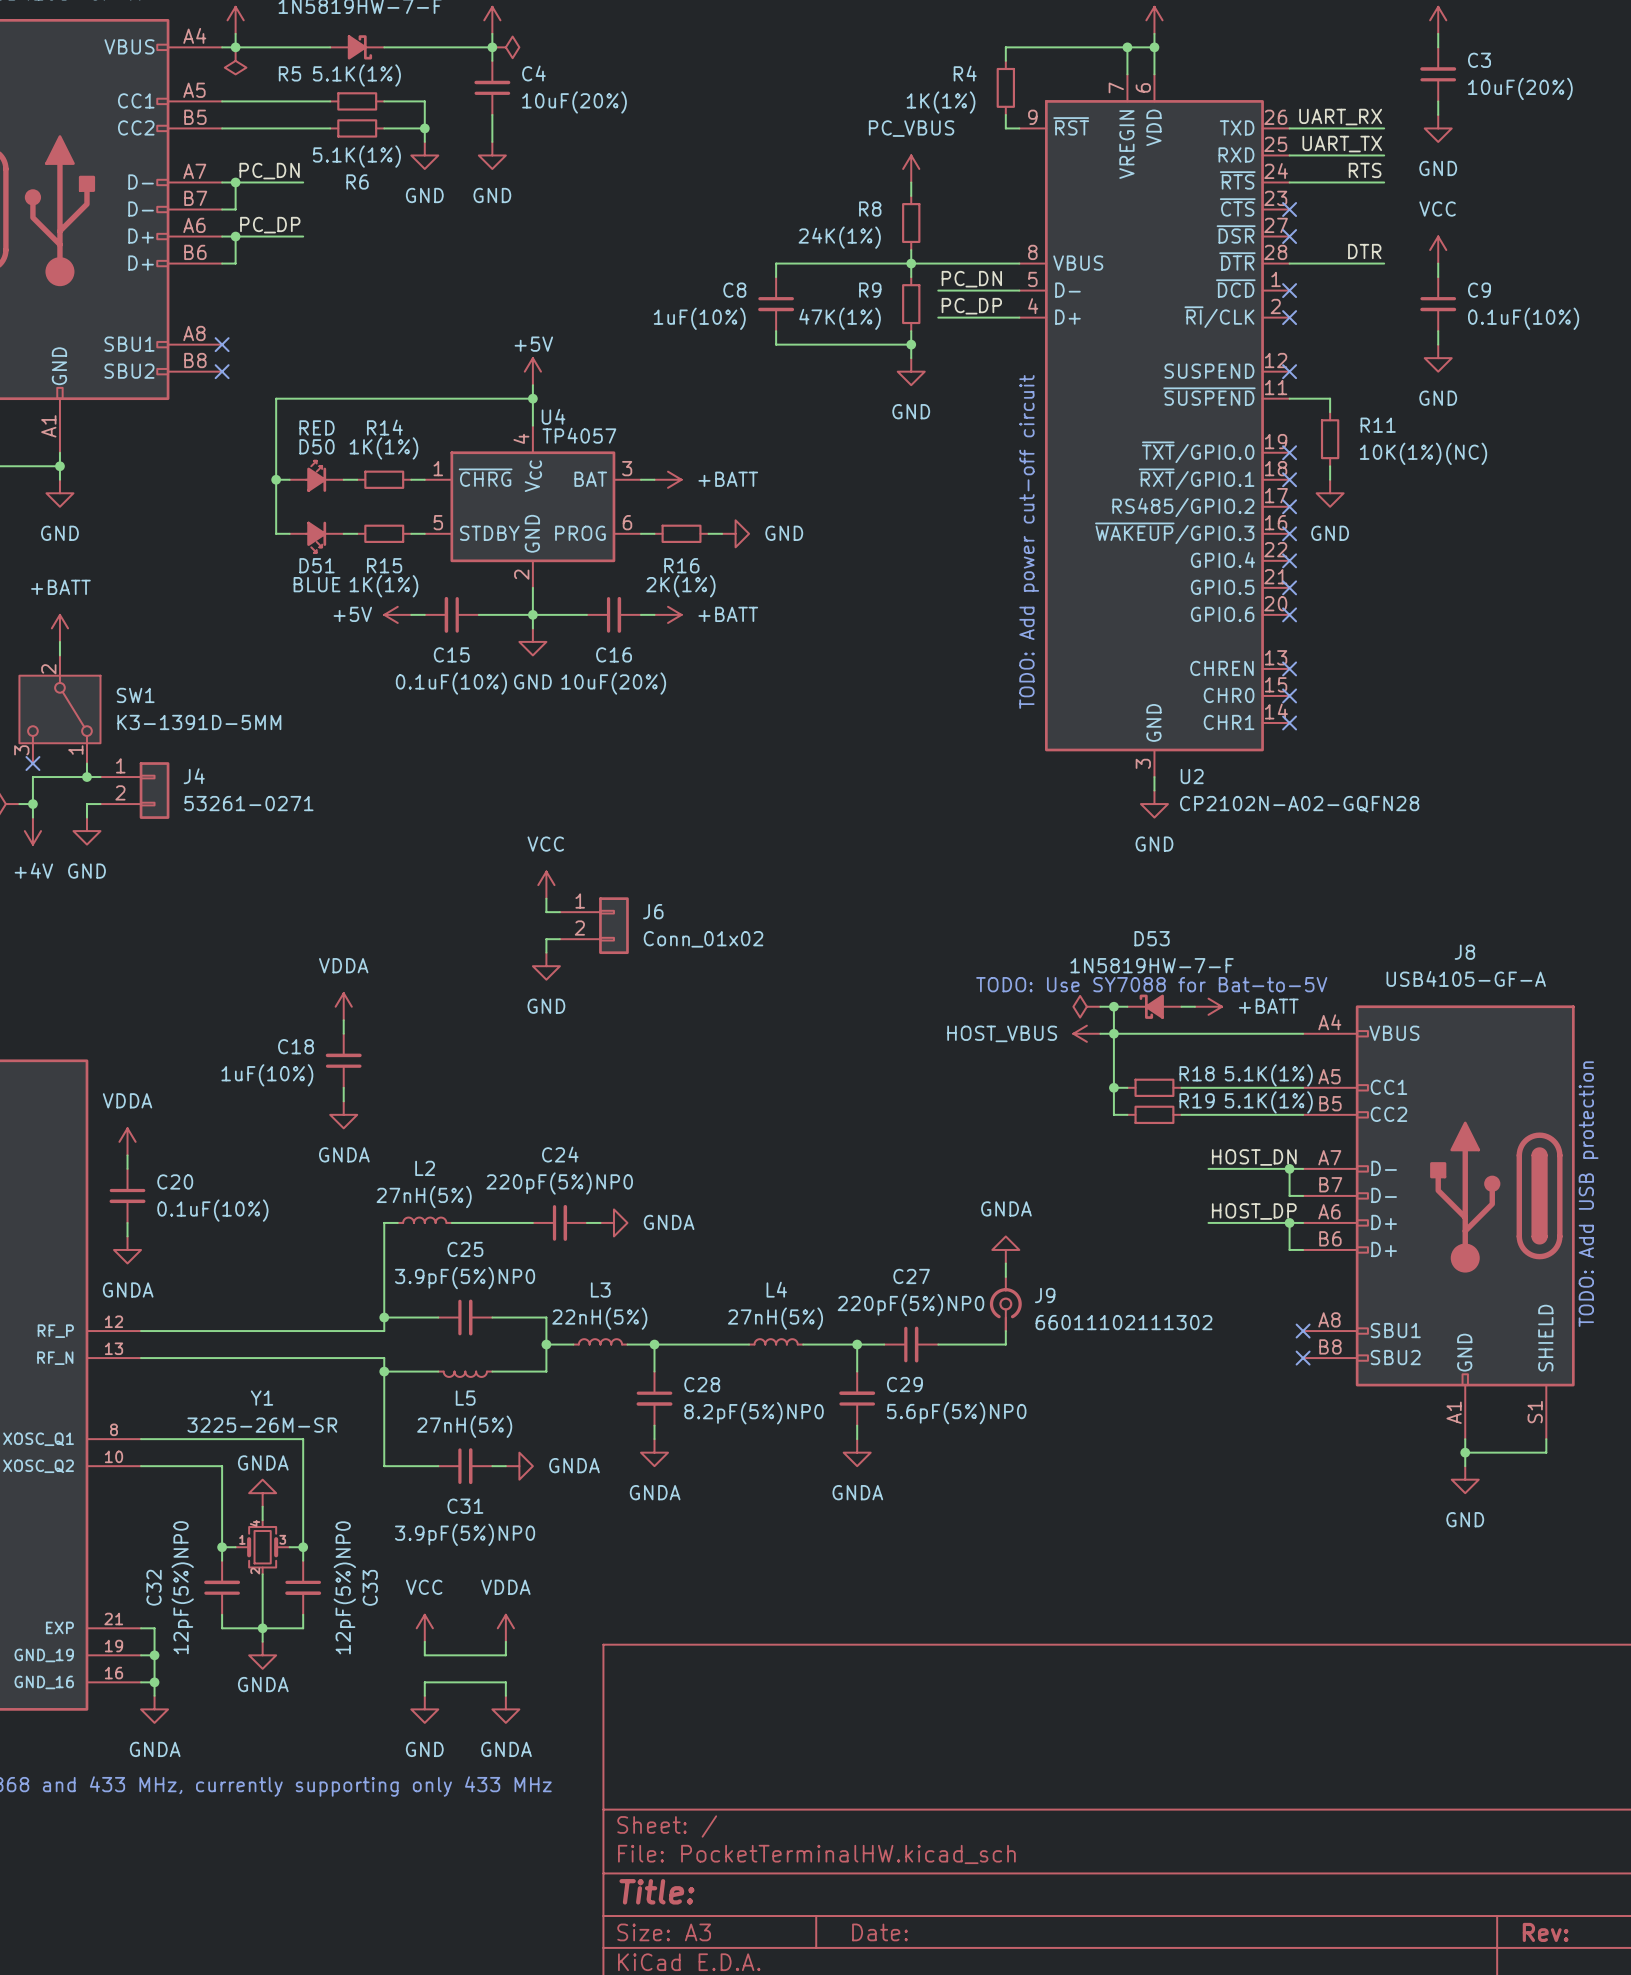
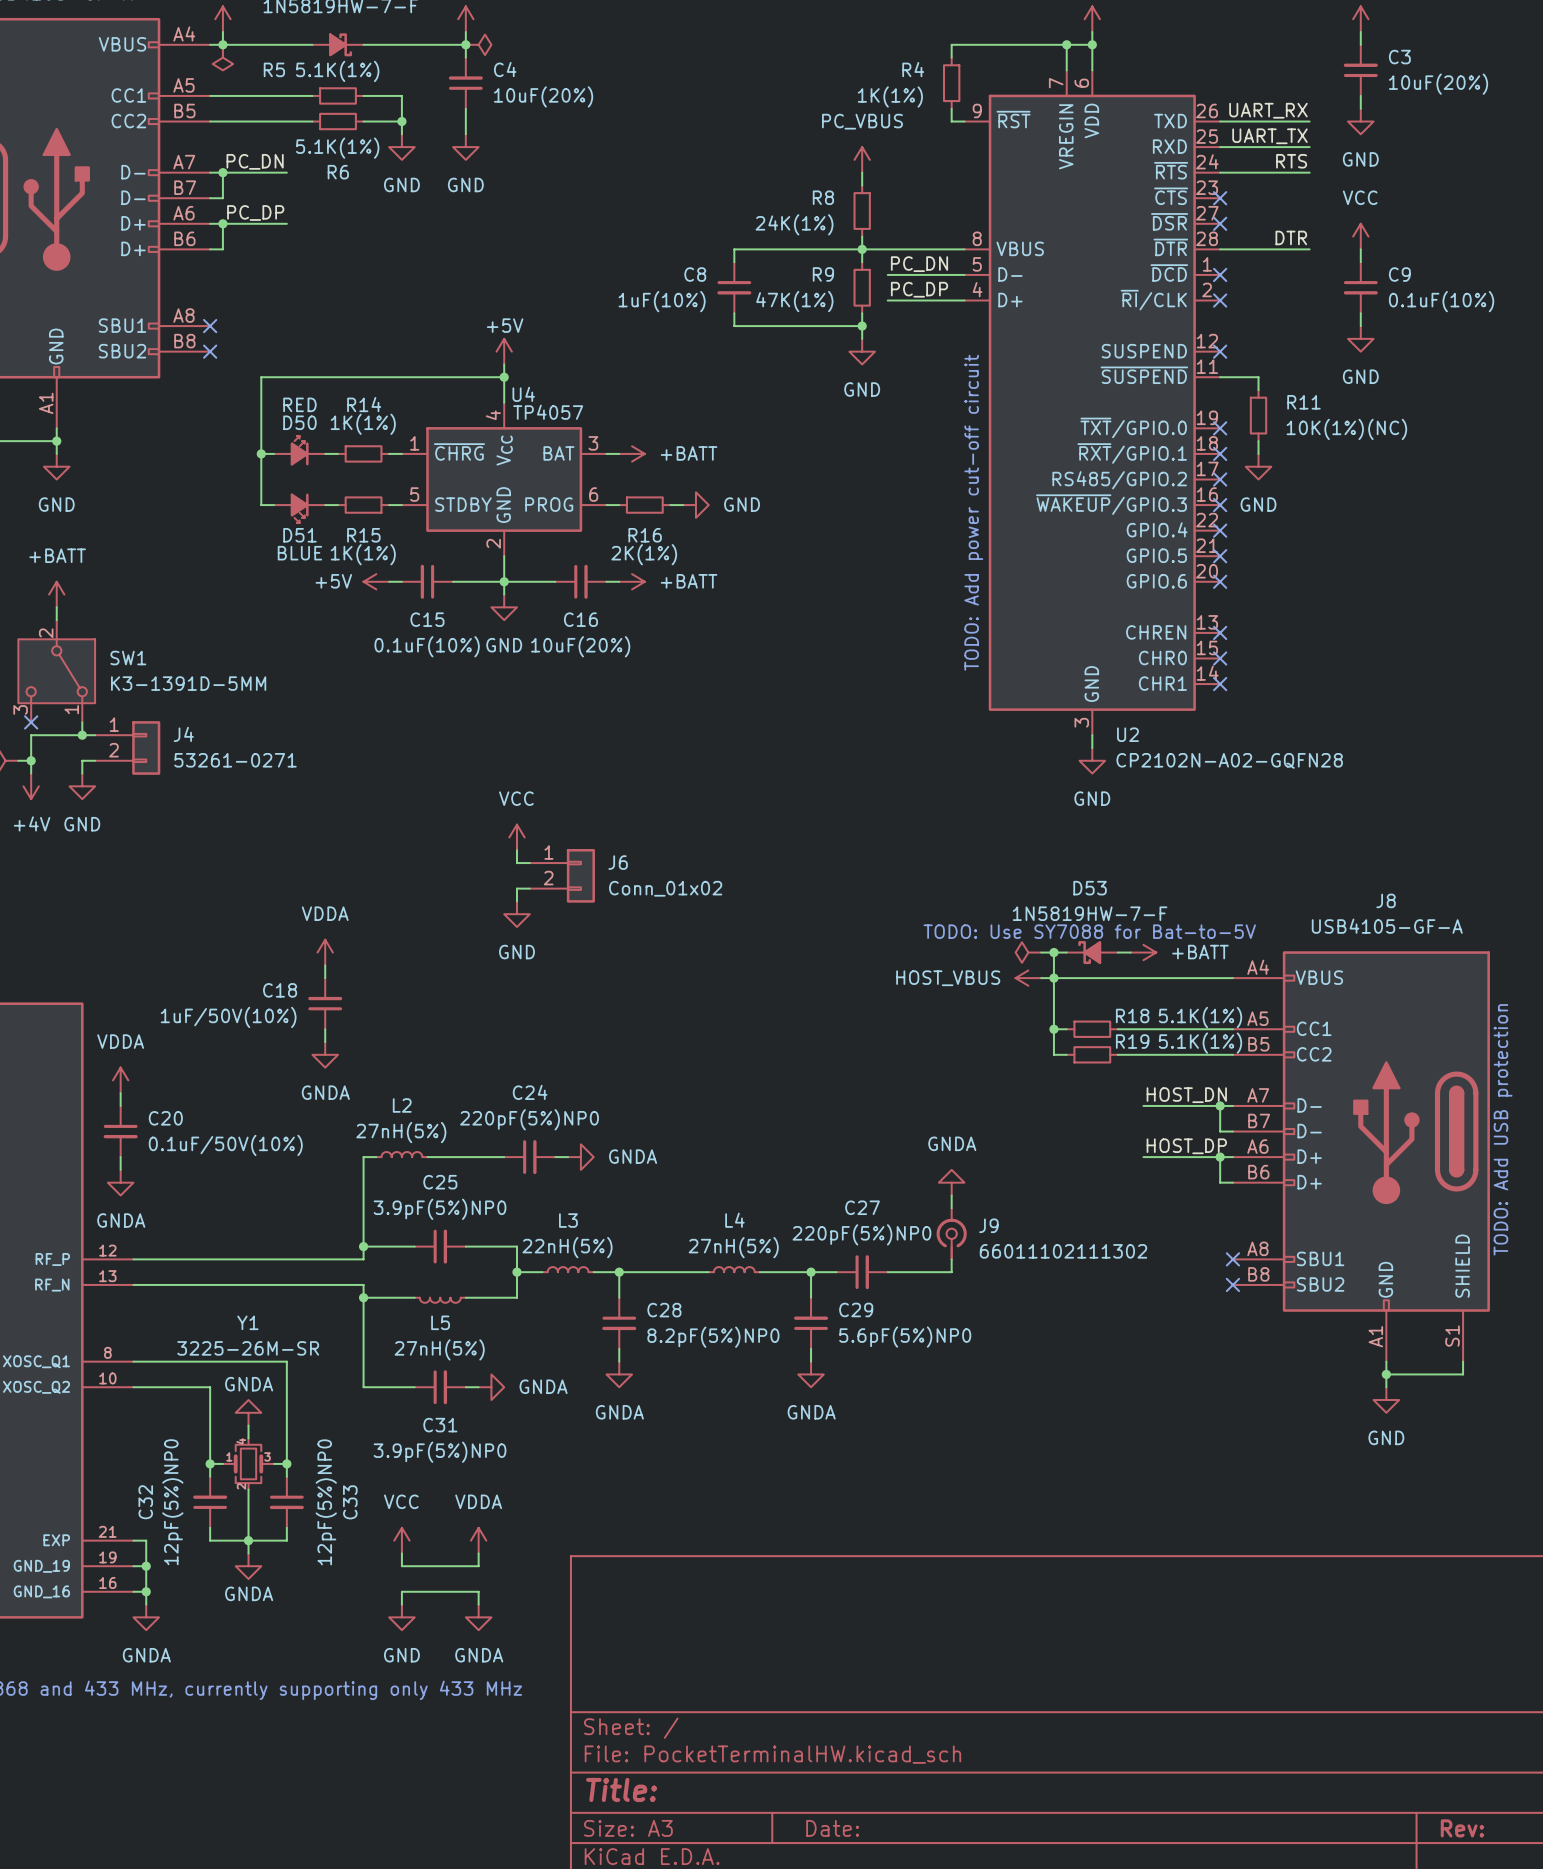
C18 value: 1uF(10%) (267, 1075) -> 1uF/50V(10%) (228, 1017)
C20 value: 0.1uF(10%) (212, 1210) -> 0.1uF/50V(10%) (225, 1145)

